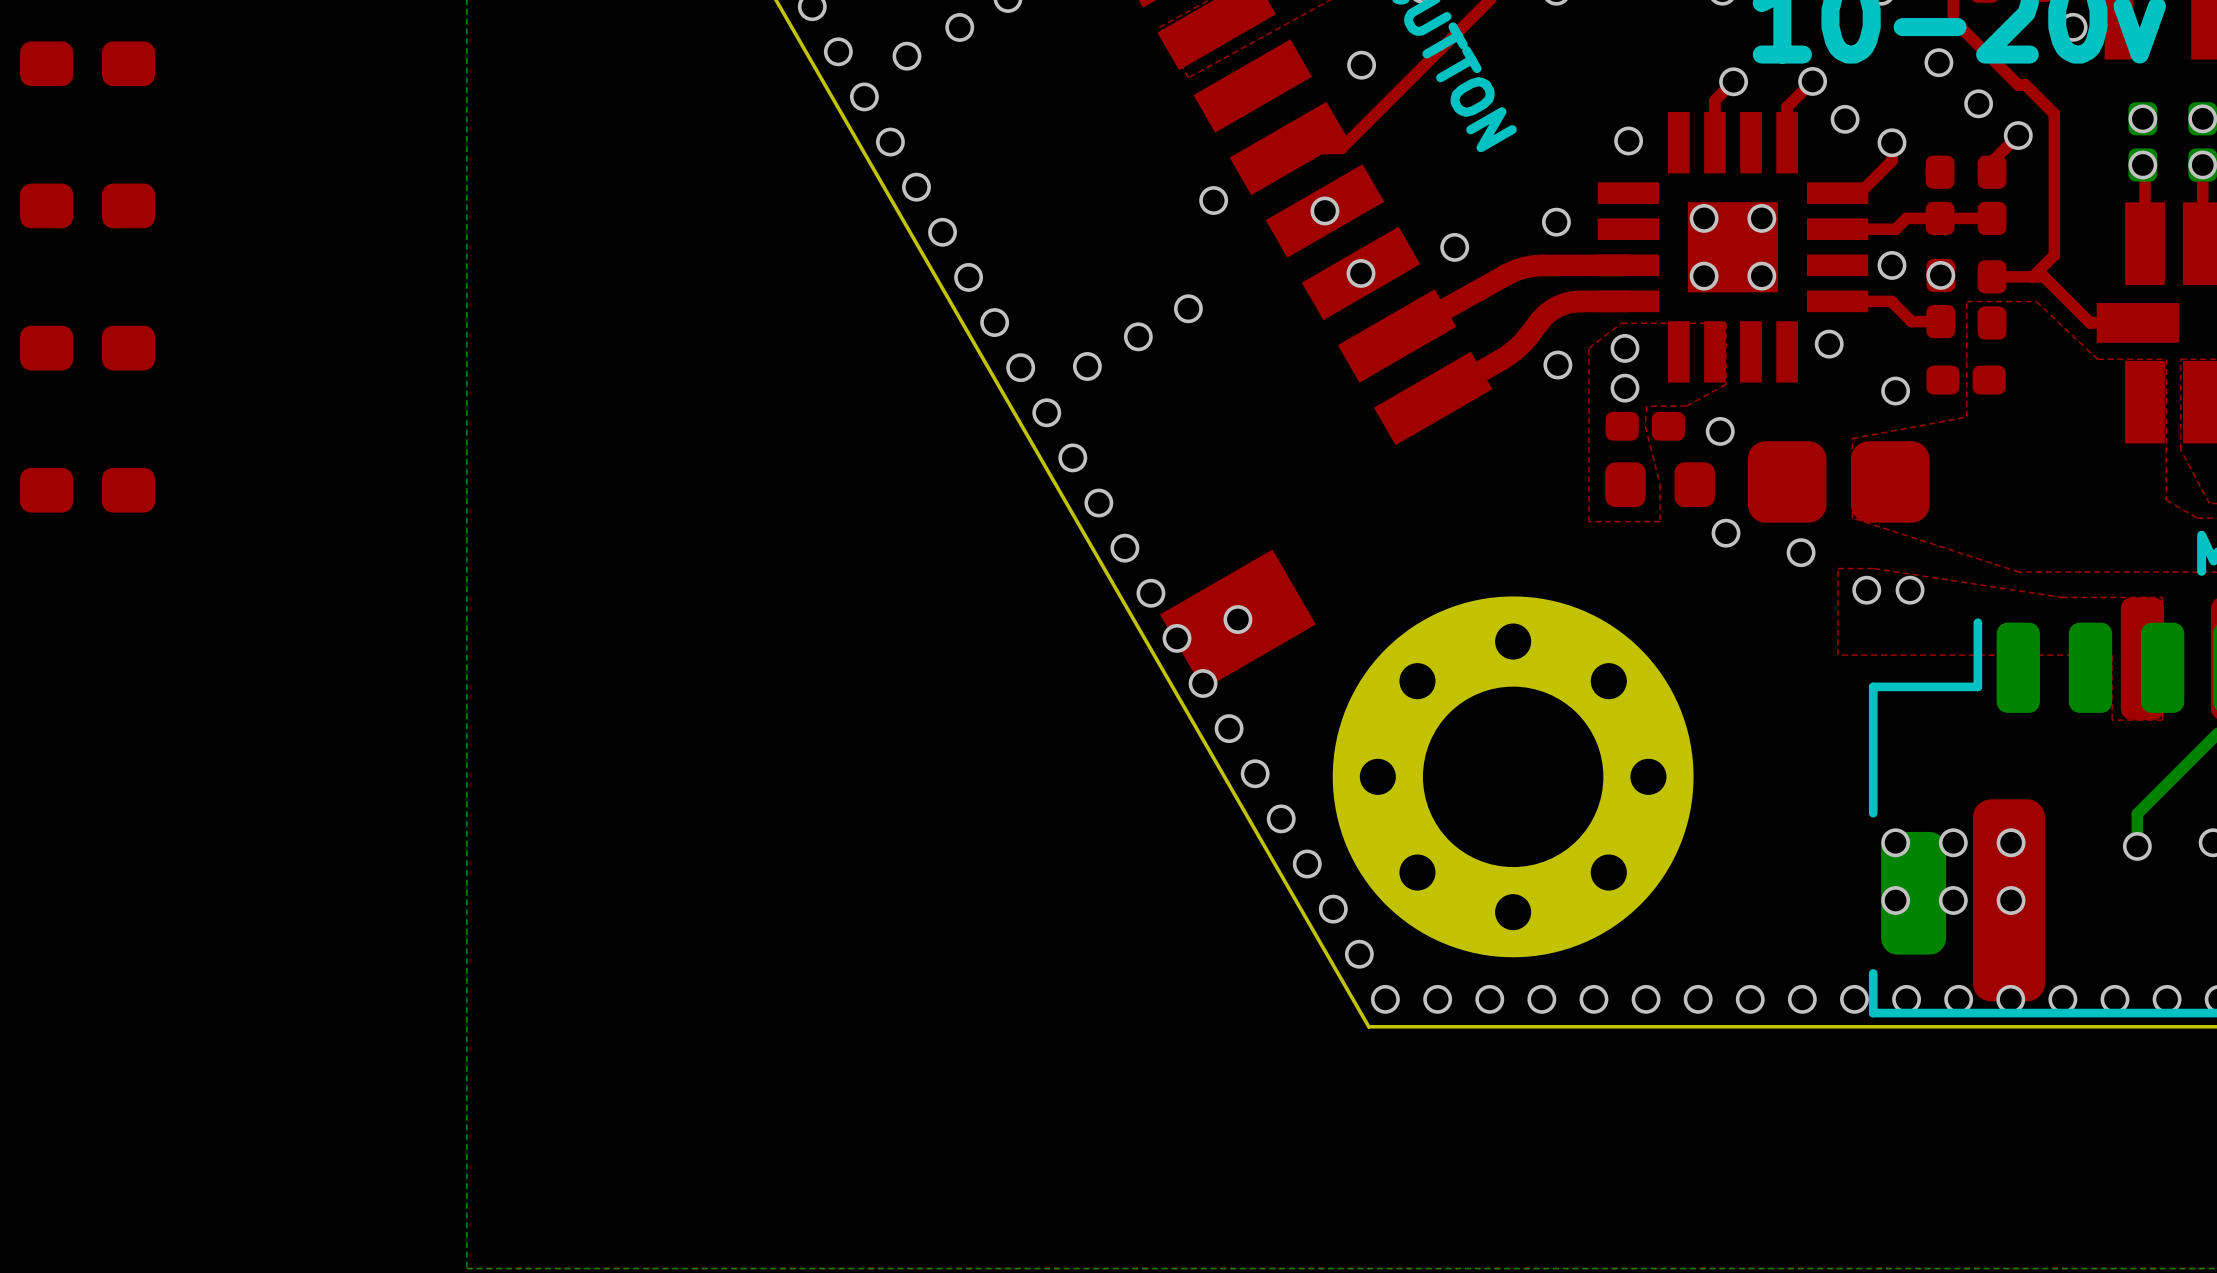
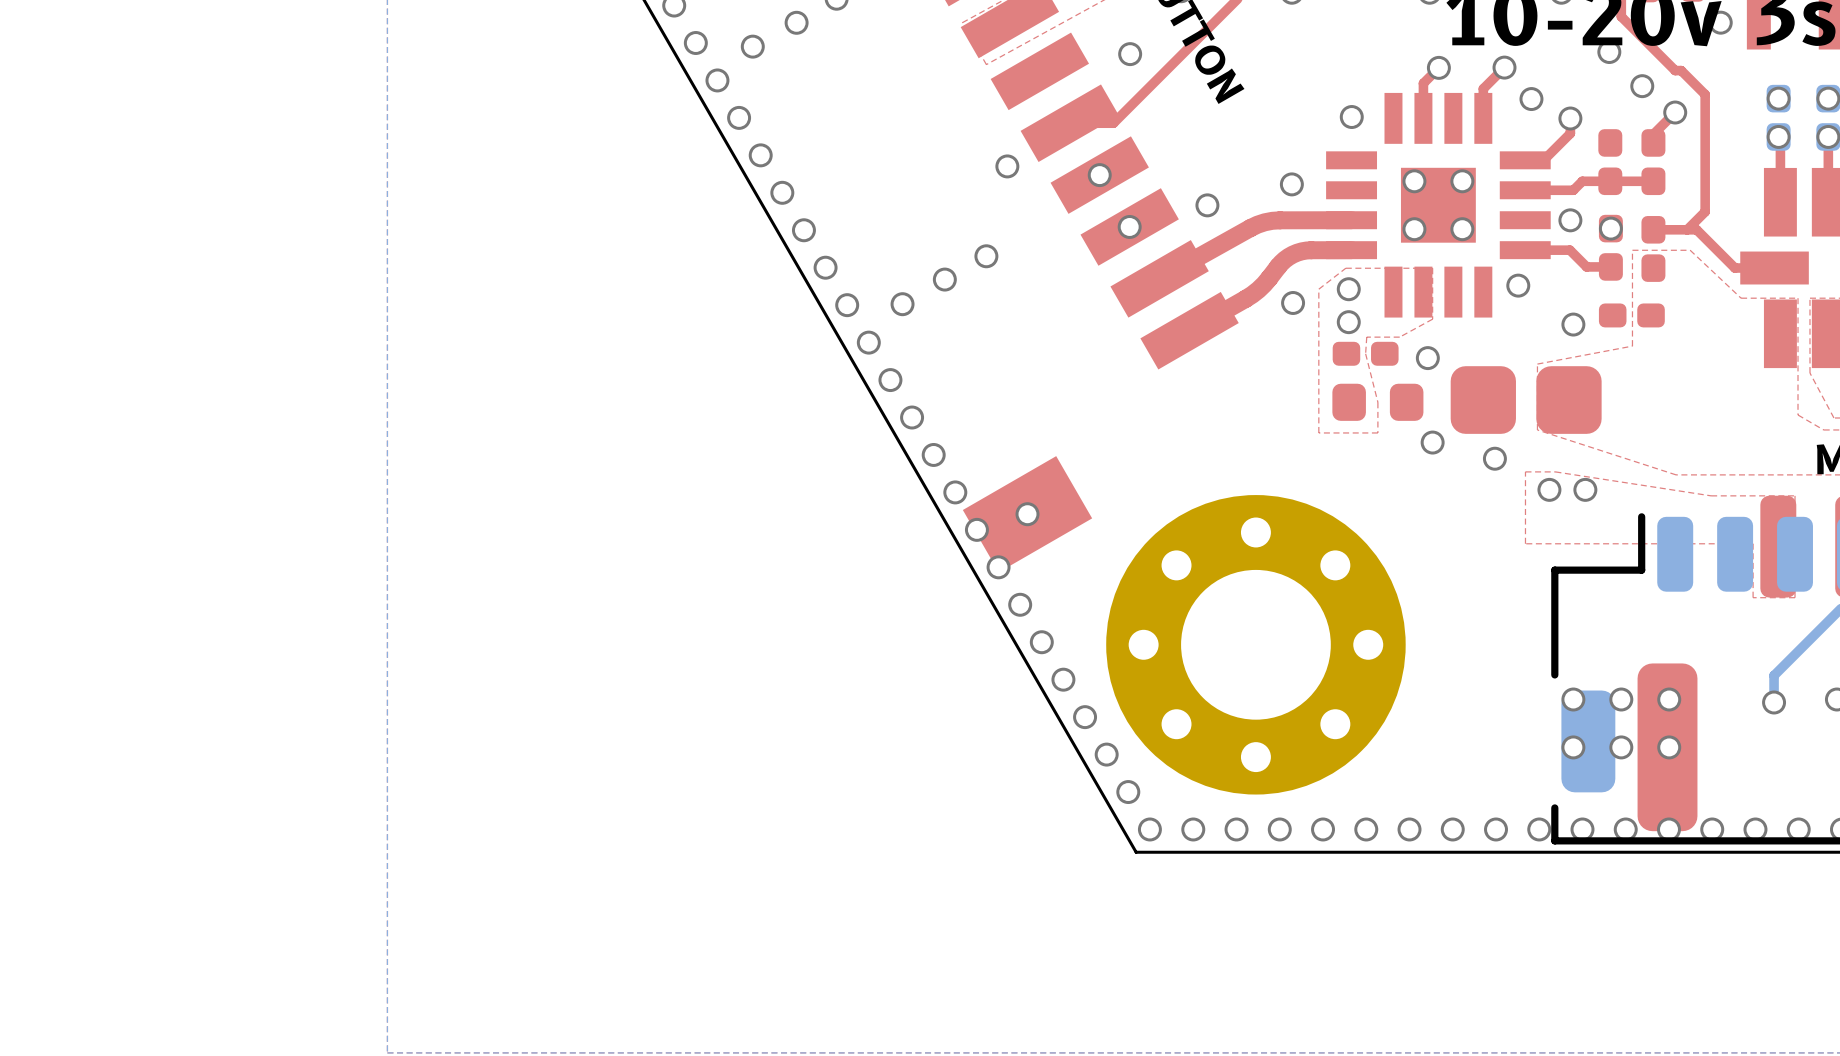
part: (87, 63) -> none
part: (87, 205) -> none
part: (87, 348) -> none
part: (87, 490) -> none

